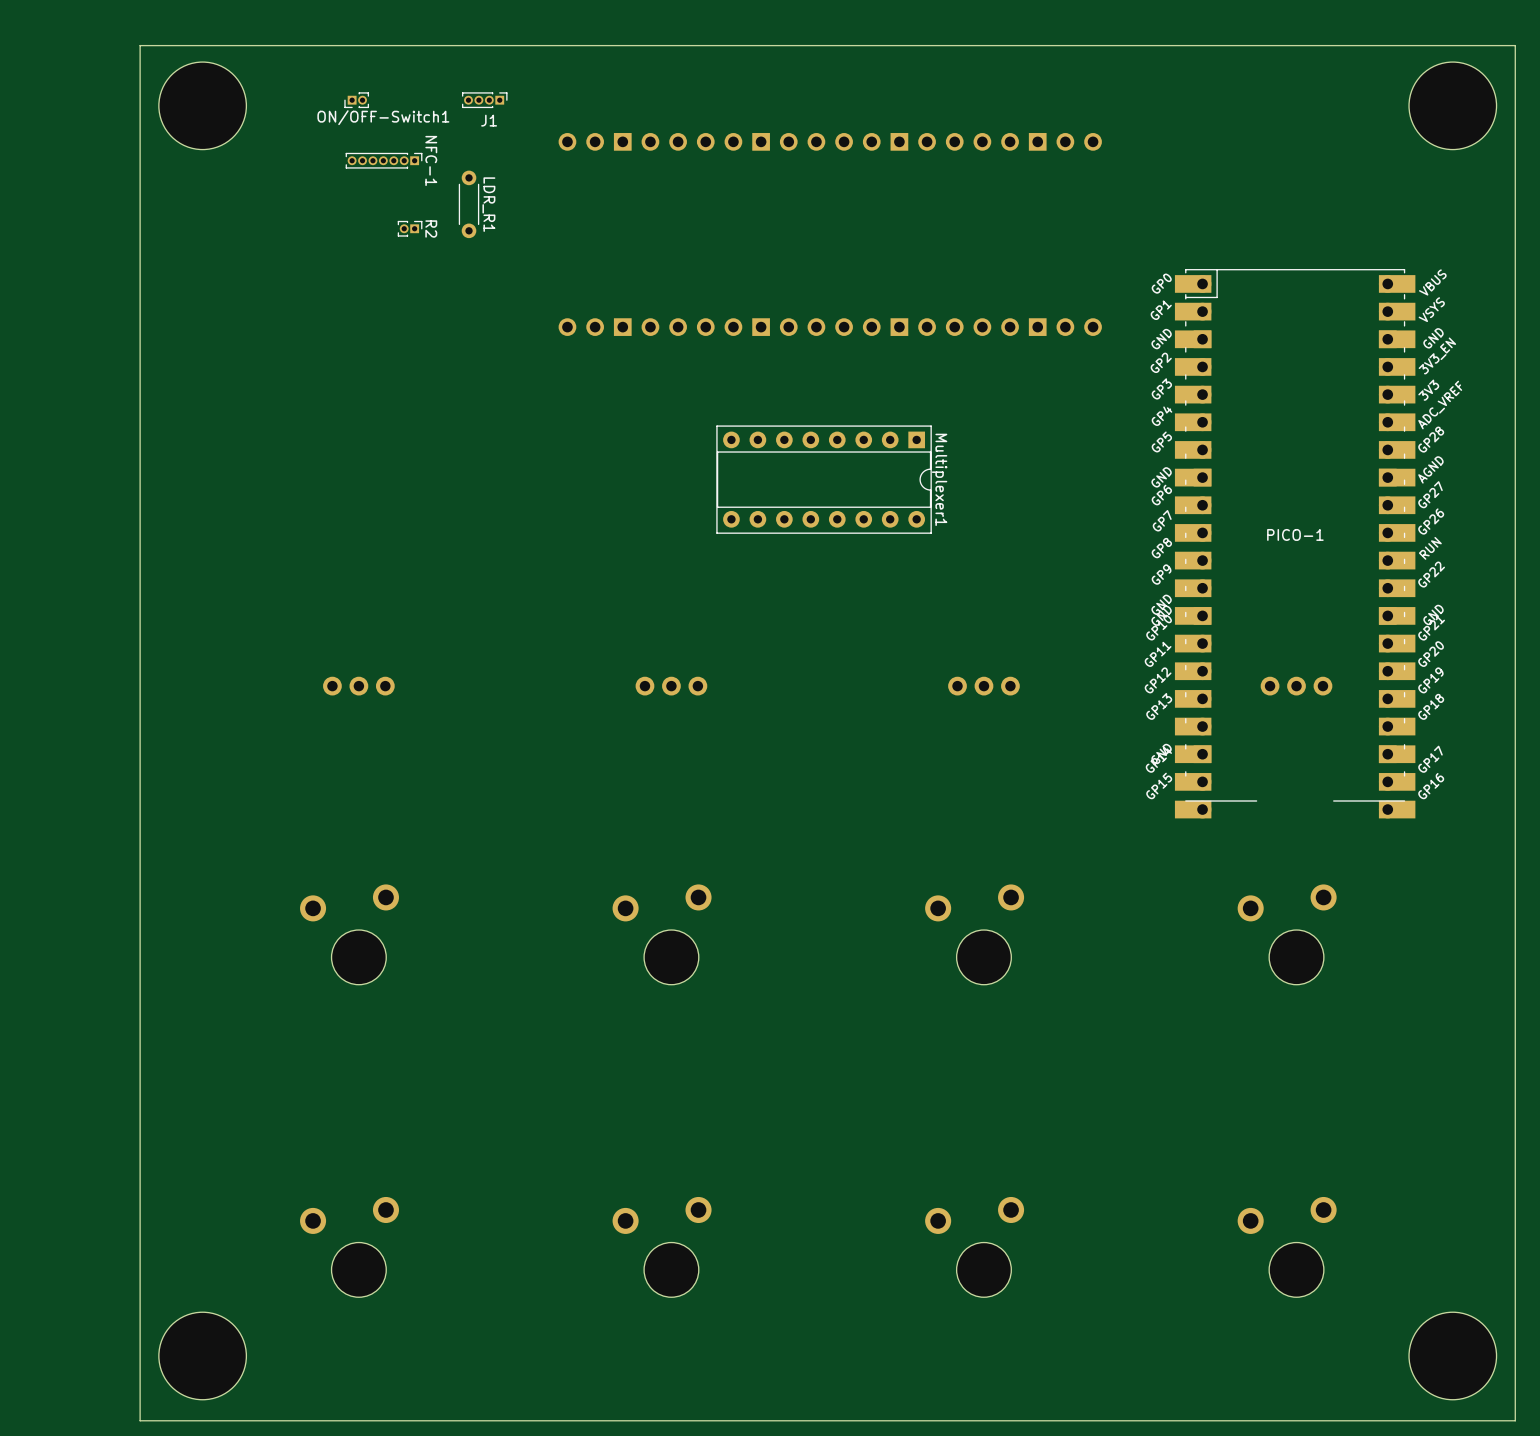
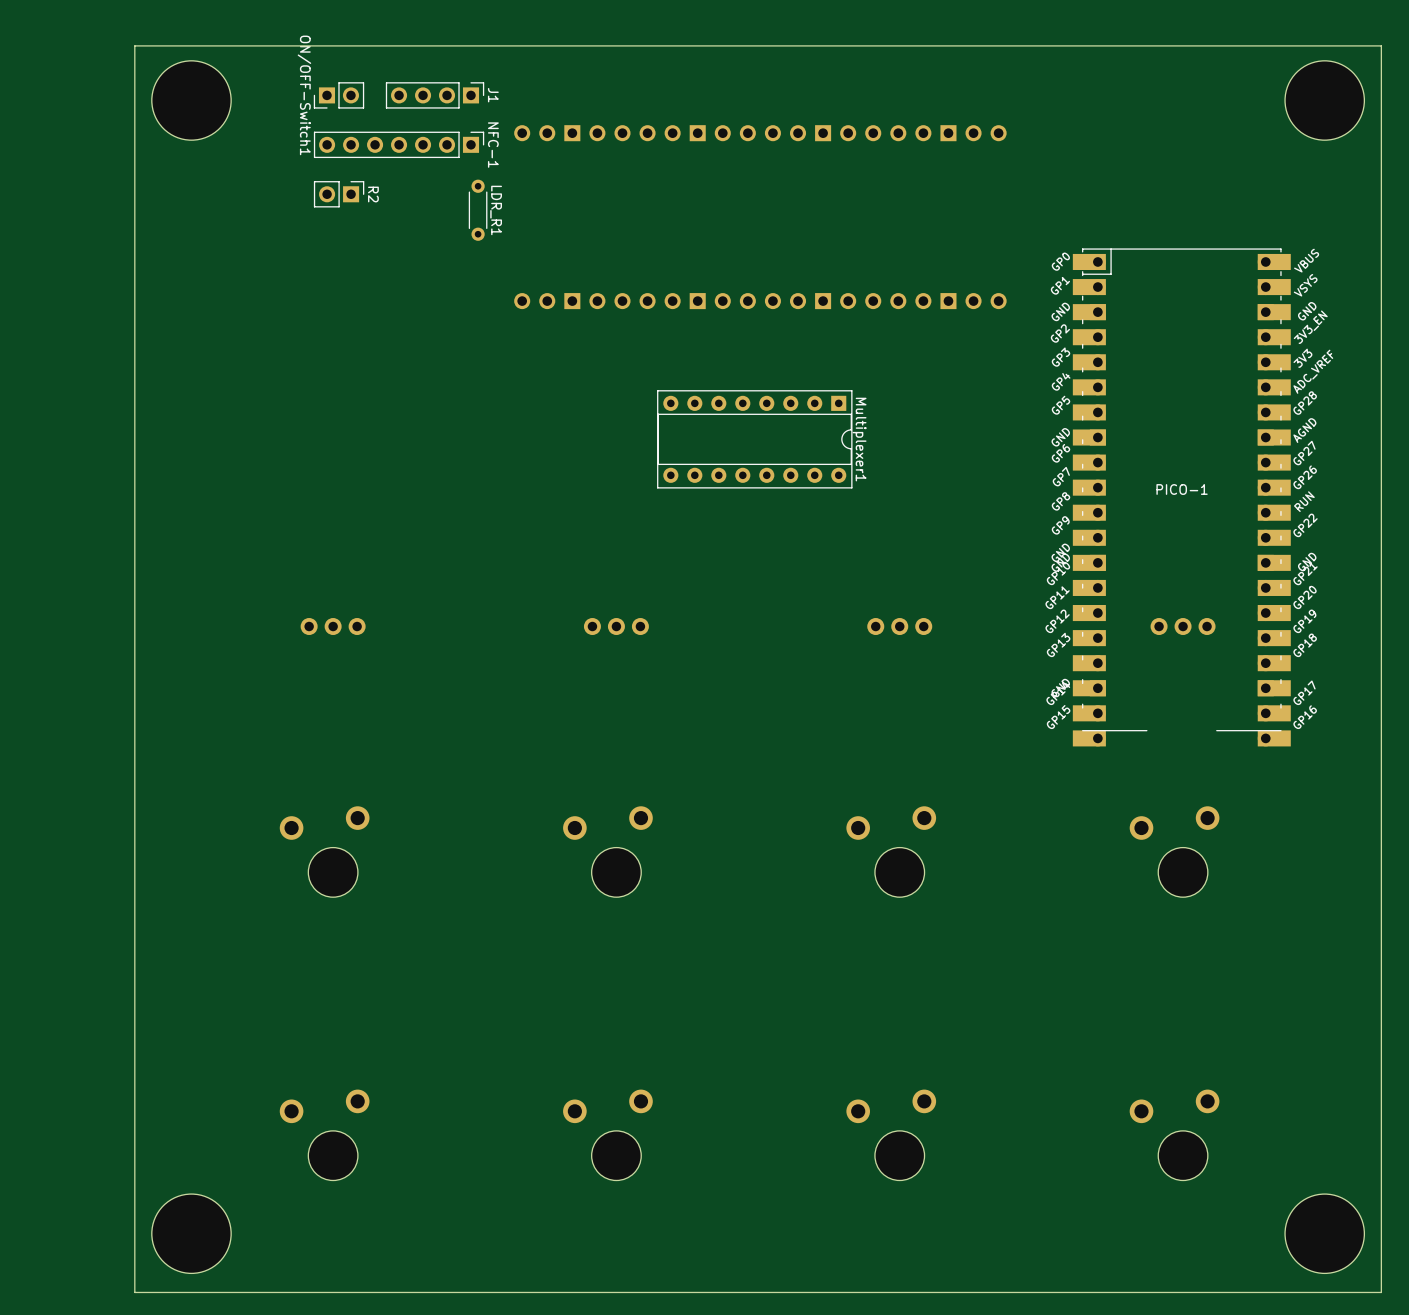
ON/OFF-Switch1 footprint: [344, 92, 370, 109] -> [313, 82, 365, 109]
J1 footprint: [462, 92, 508, 109] -> [385, 82, 485, 109]
ON/OFF-Switch1 name position: ON/OFF-Switch1 (383, 117) -> ON/OFF-Switch1 (304, 95)
J1 name position: J1 (489, 120) -> J1 (493, 95)
NFC-1 footprint: [345, 152, 423, 169] -> [313, 131, 485, 158]
NFC-1 name position: NFC-1 (431, 160) -> NFC-1 (493, 145)
LDR_R1 position: (469, 204) -> (478, 210)
R2 footprint: [397, 220, 423, 237] -> [313, 181, 365, 208]

